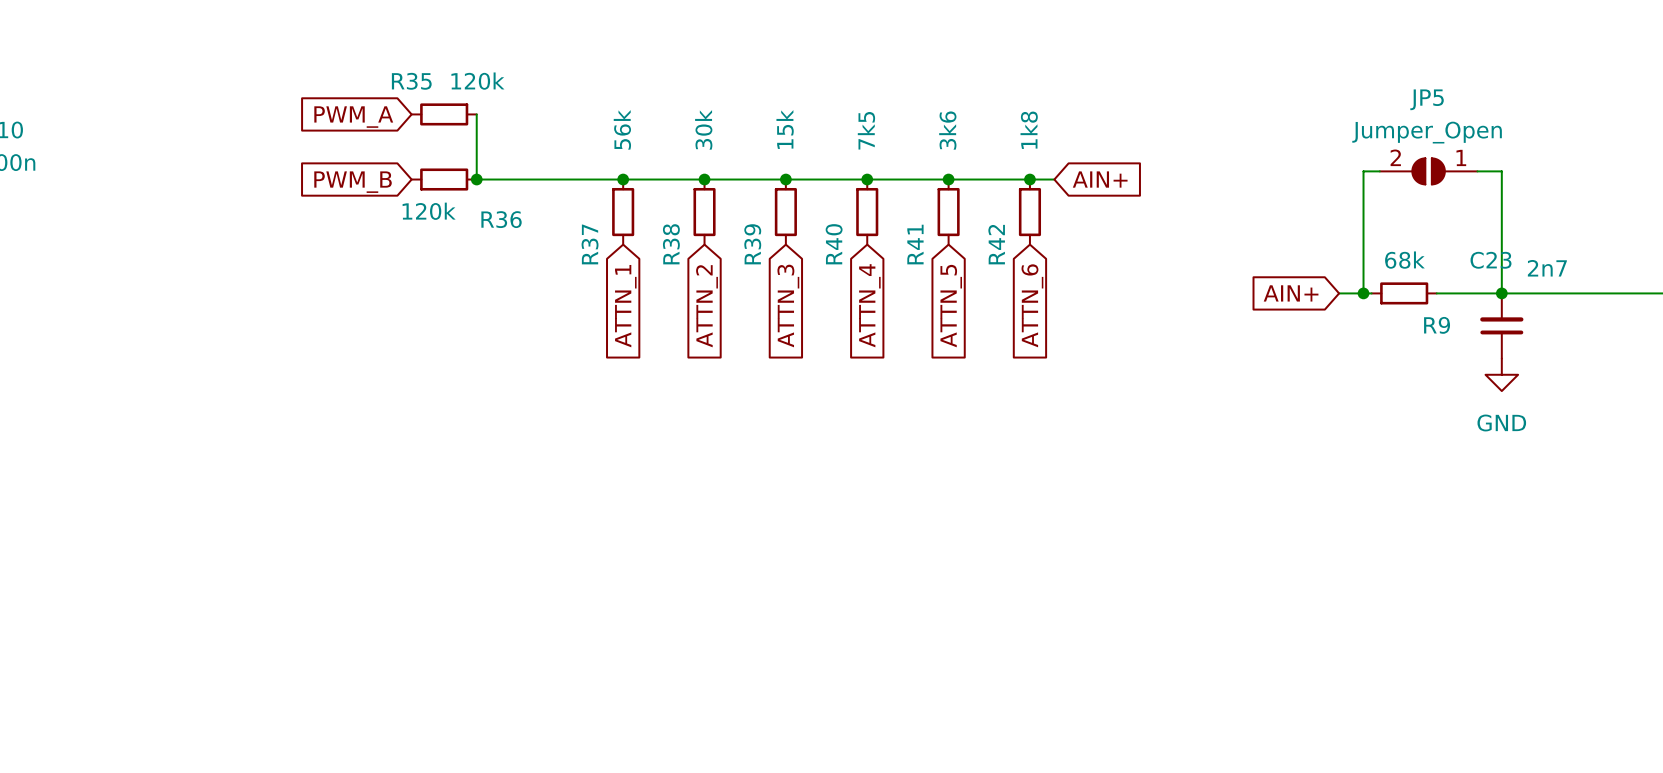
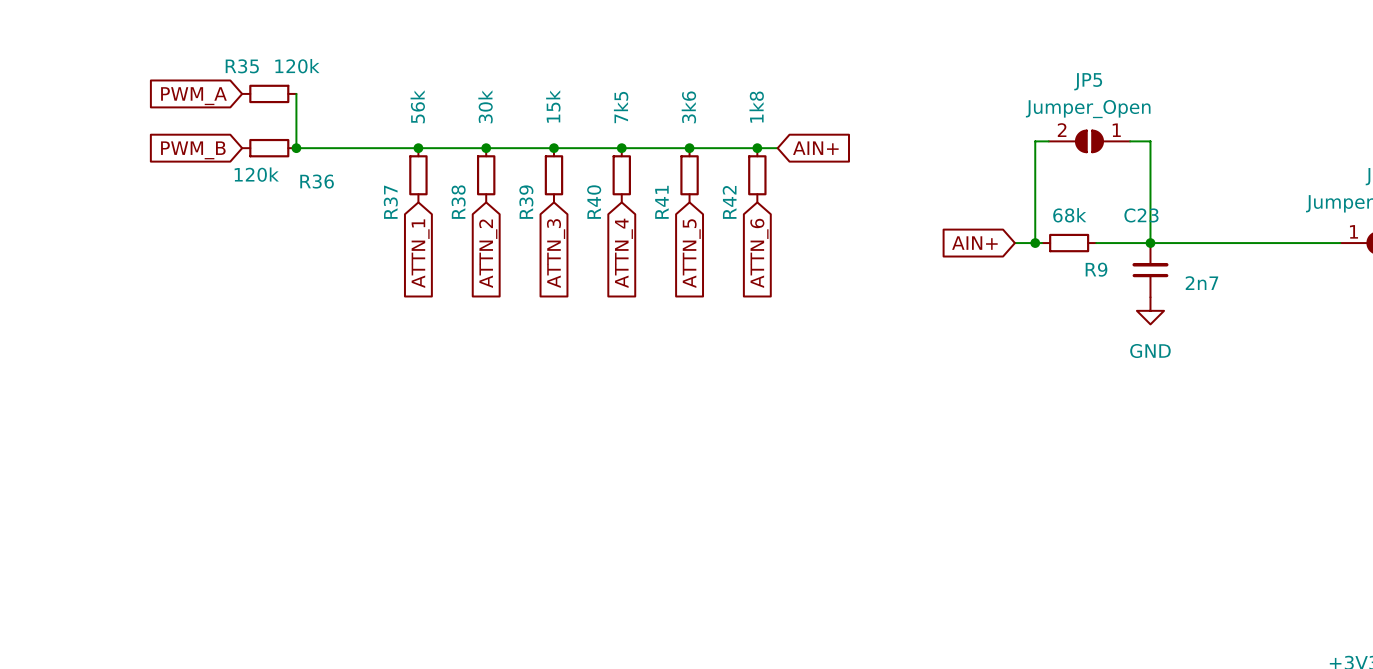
C23 value position: 2n7 (1547, 268) -> 2n7 (1201, 283)

